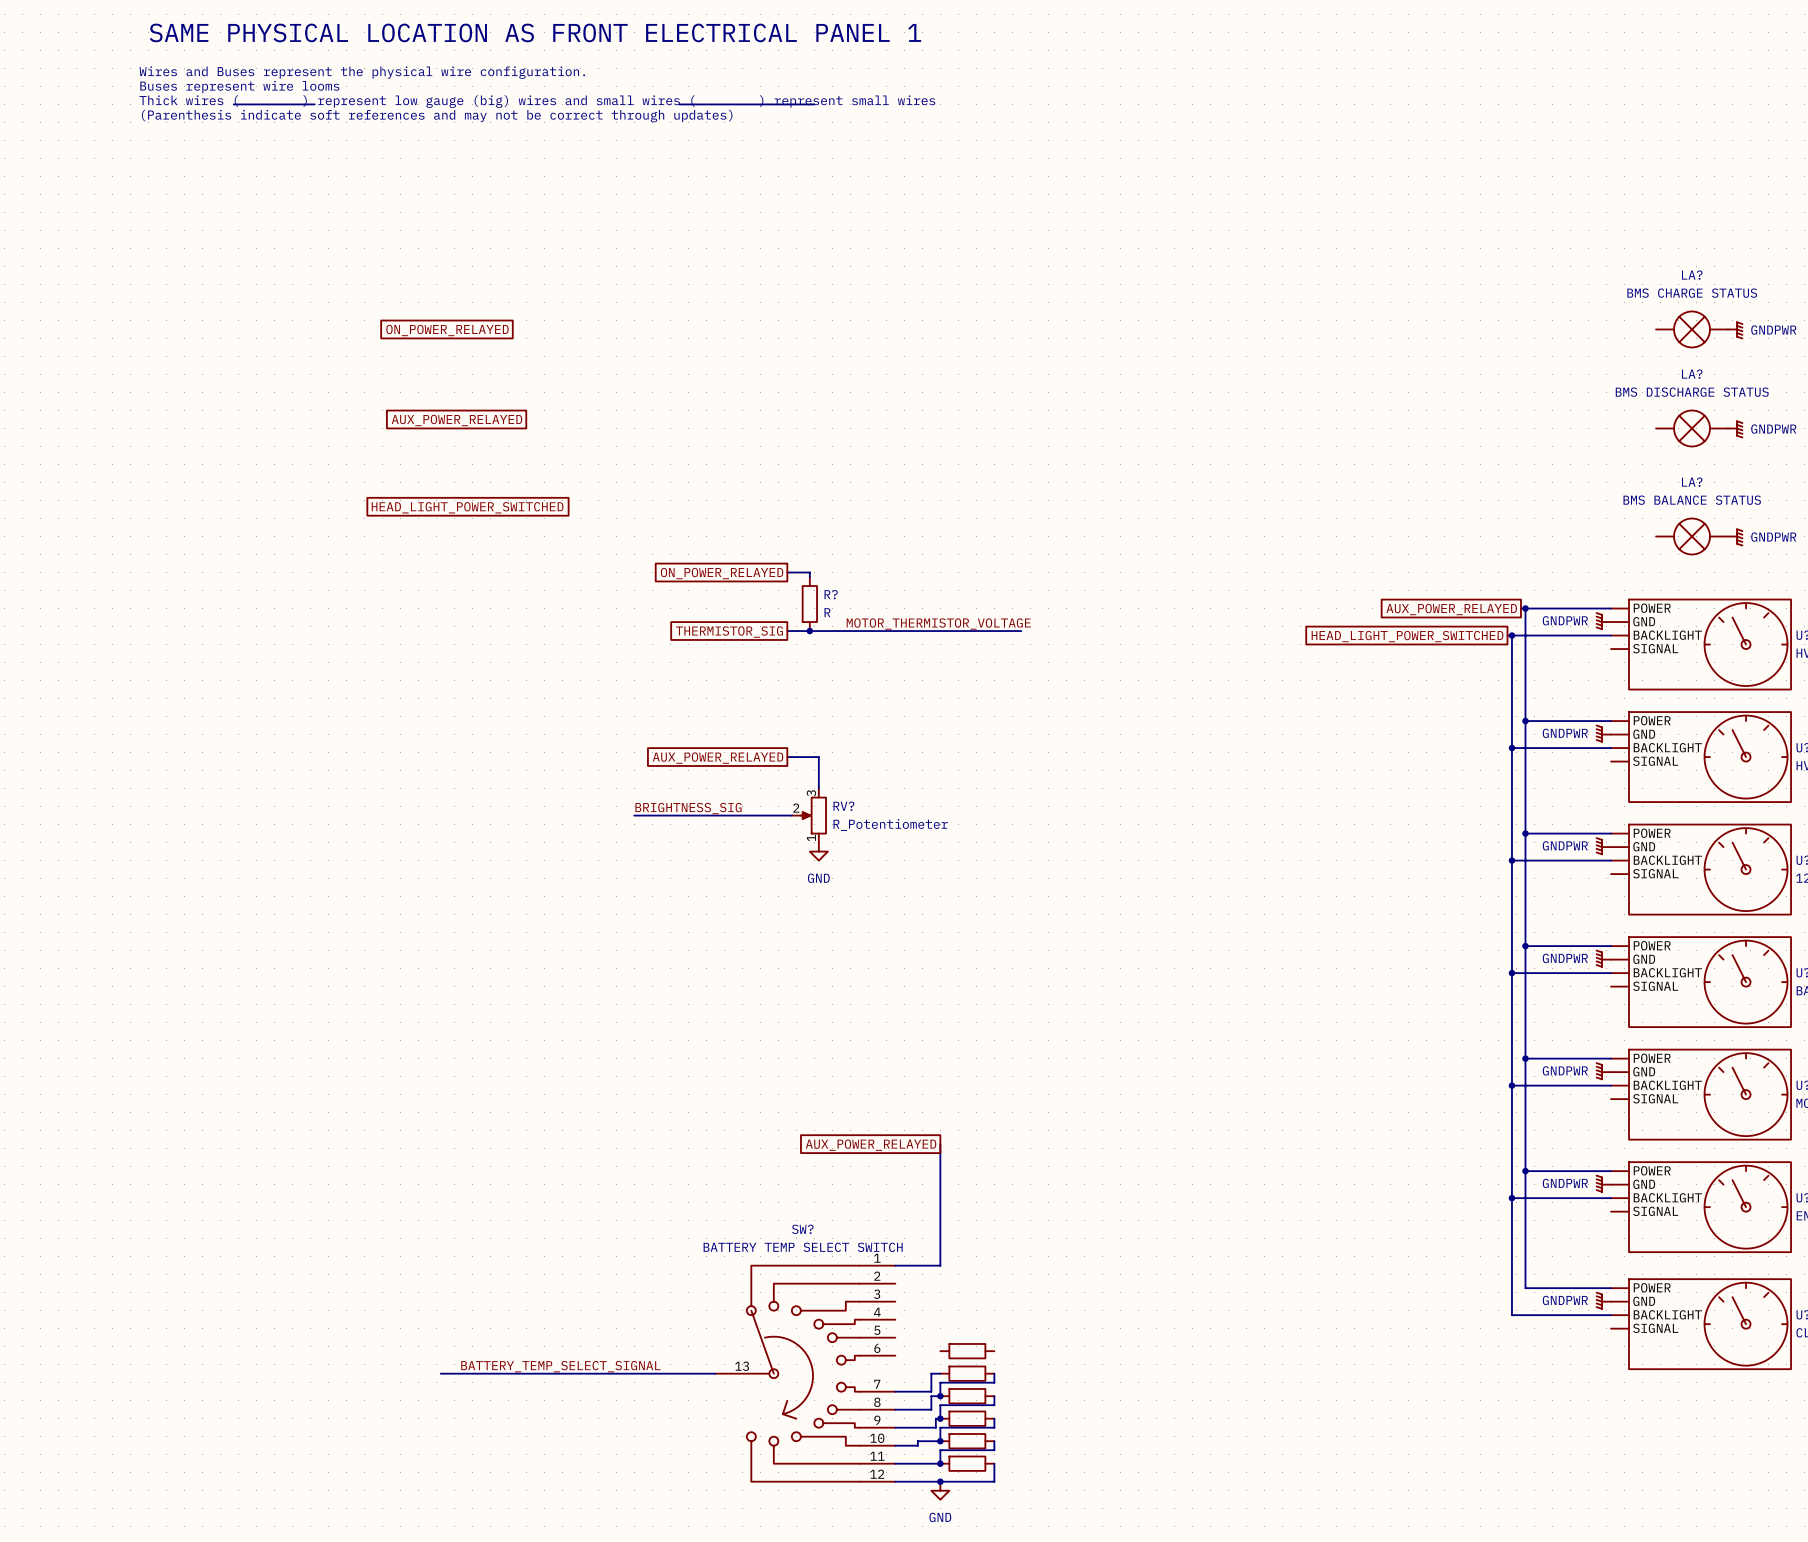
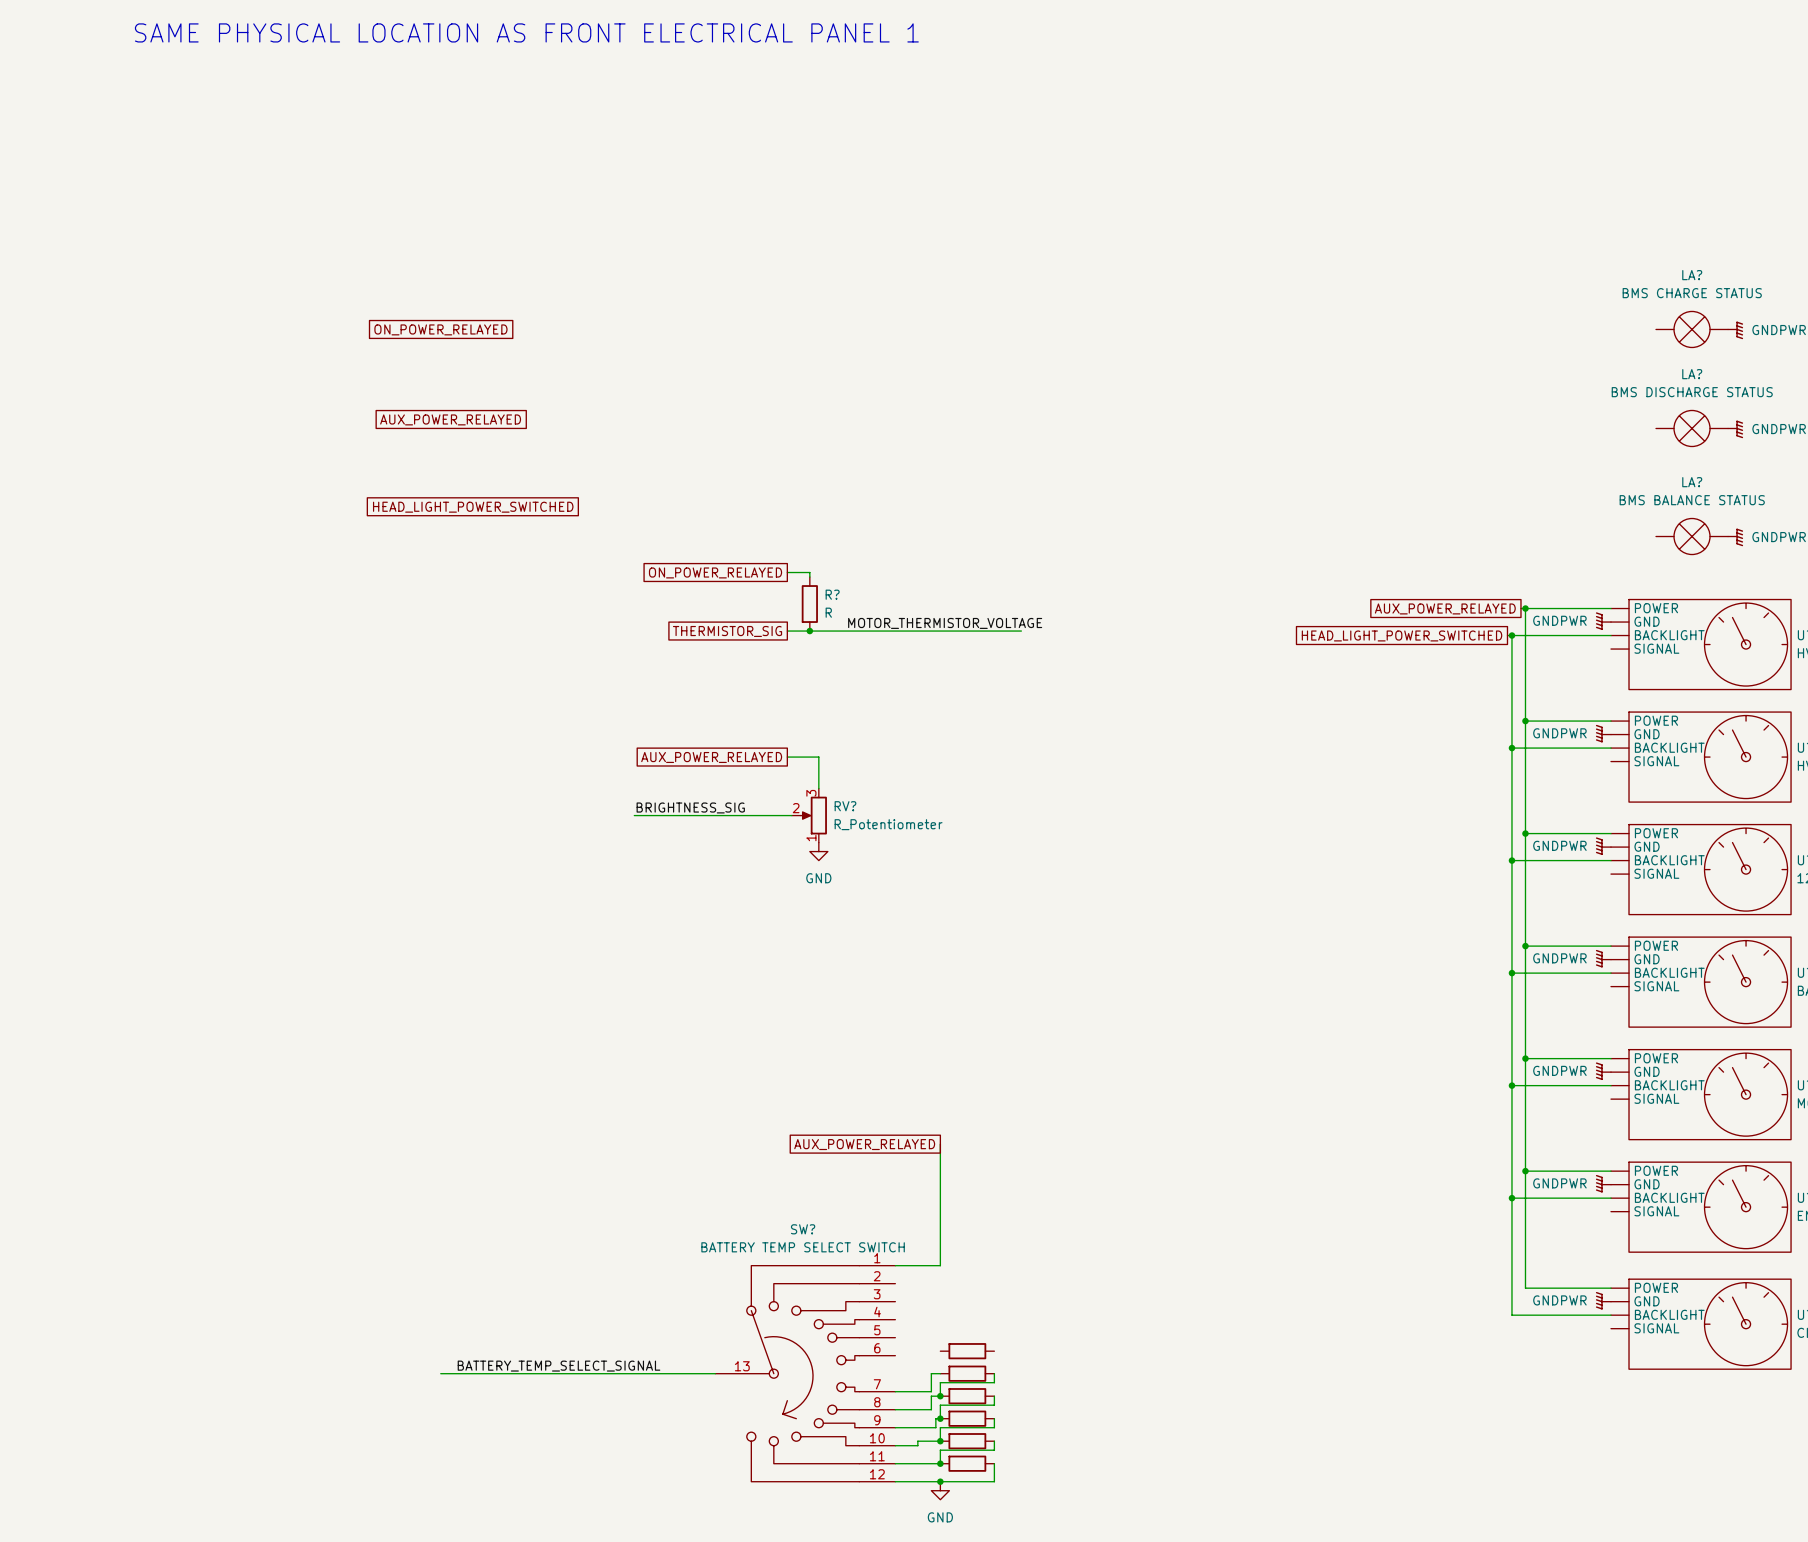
text: Wires and Buses represent the physical wire configuration. (362, 72) -> none
text: Buses represent wire looms (239, 87) -> none
text: Thick wires ( ) represent low gauge (big) wires and small wires ( ) represent small wires (537, 101) -> none
wire: (233, 104) (314, 104) -> none
wire: (679, 104) (814, 104) -> none
text: (Parenthesis indicate soft references and may not be correct through updates) (437, 116) -> none

